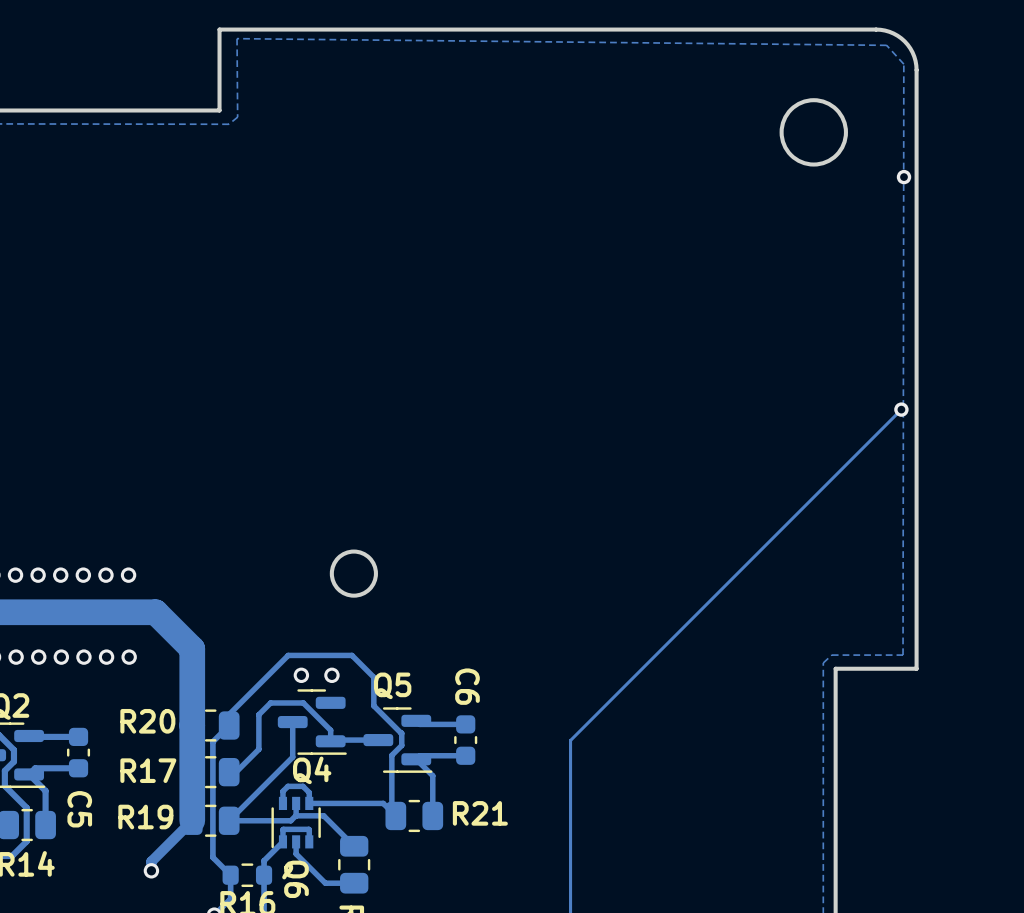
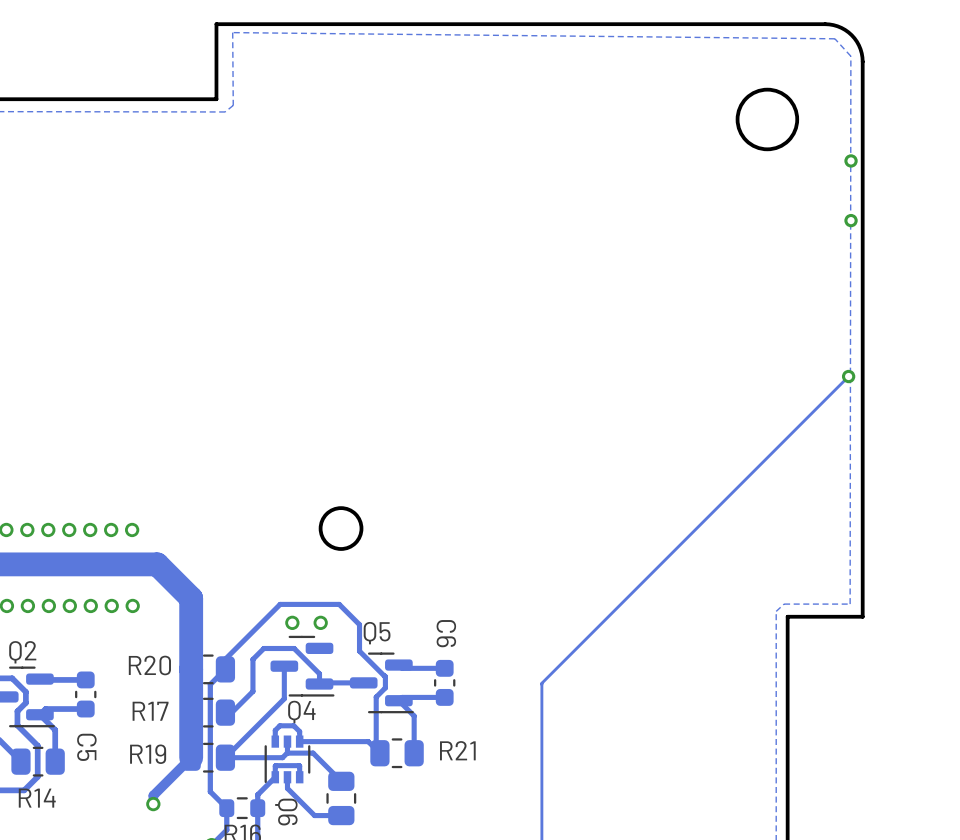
via: none -> (851, 220)

